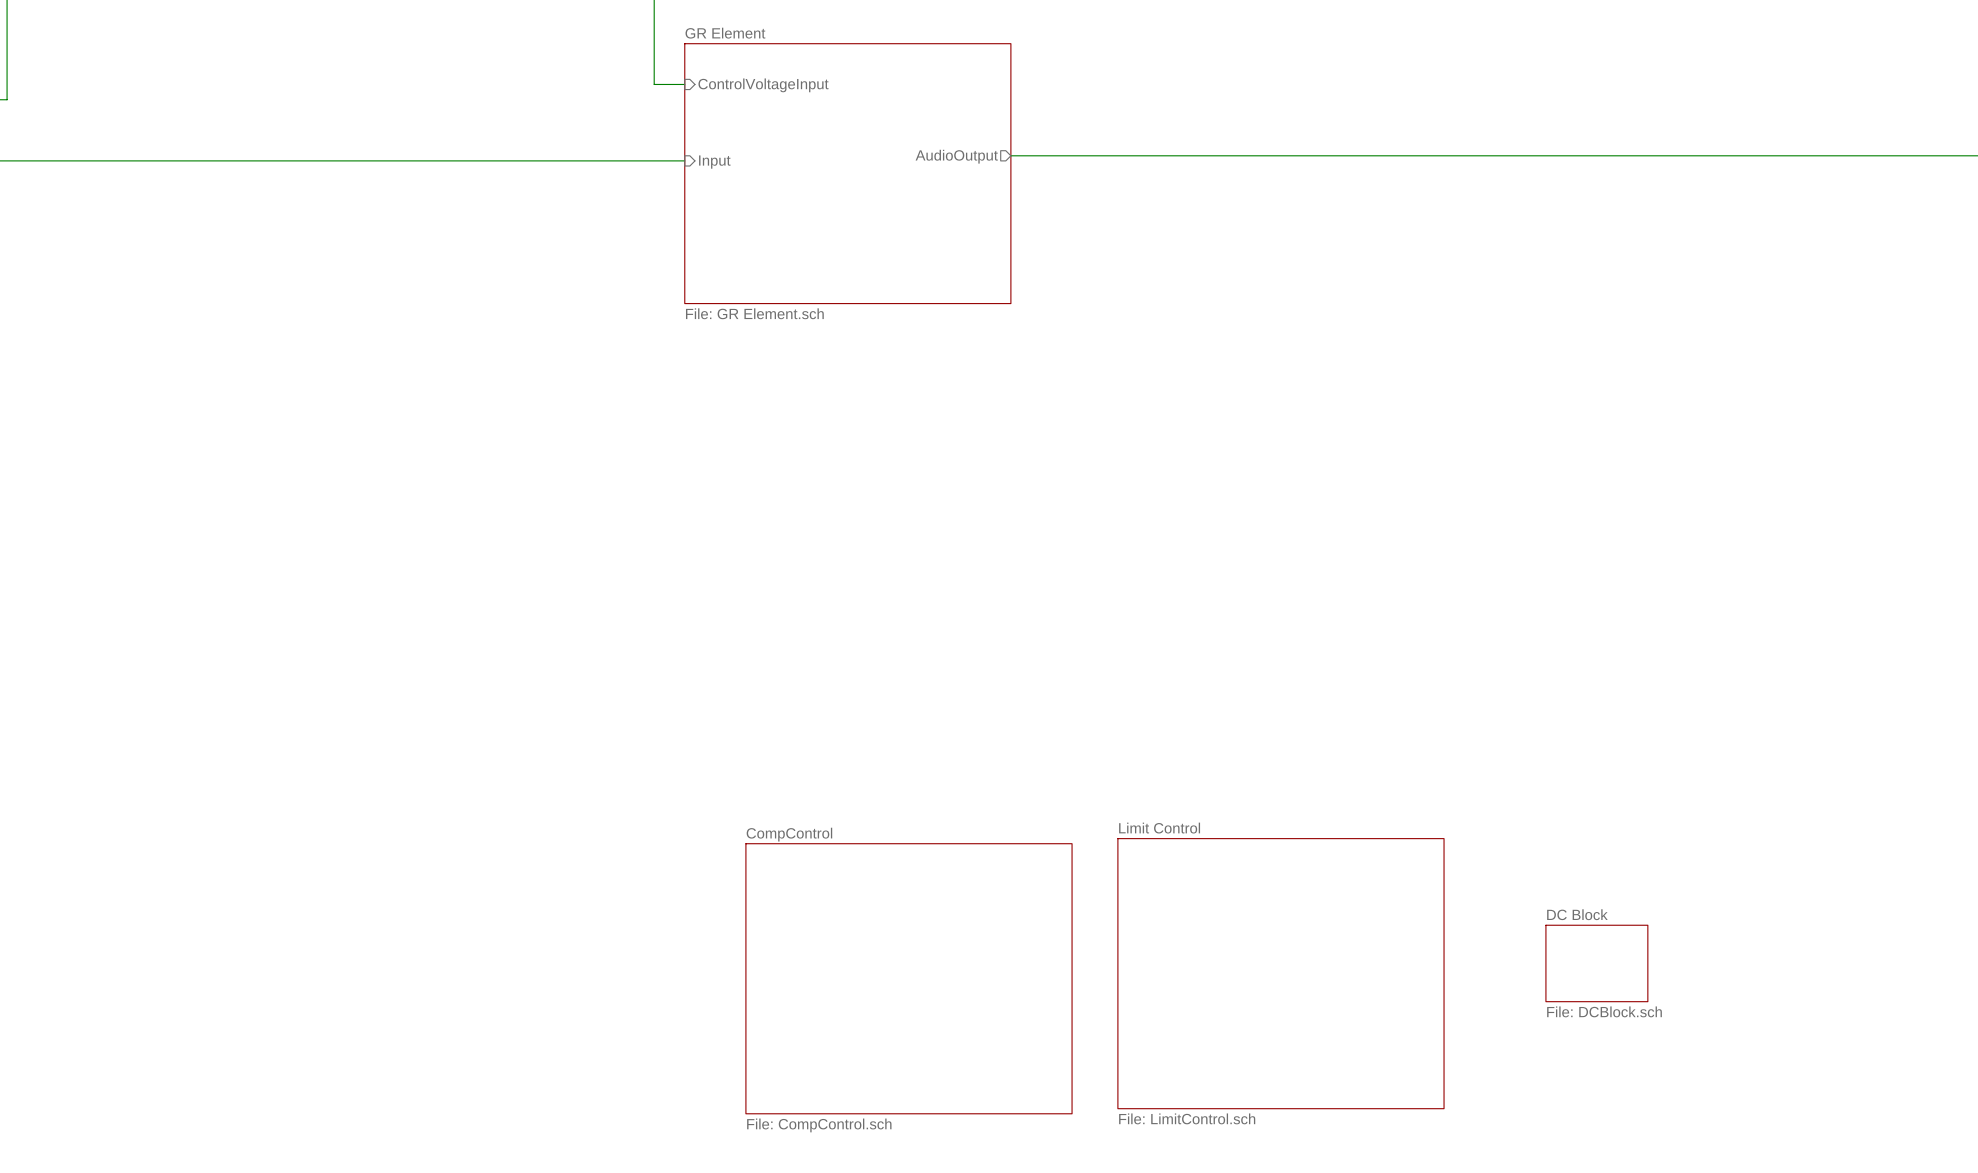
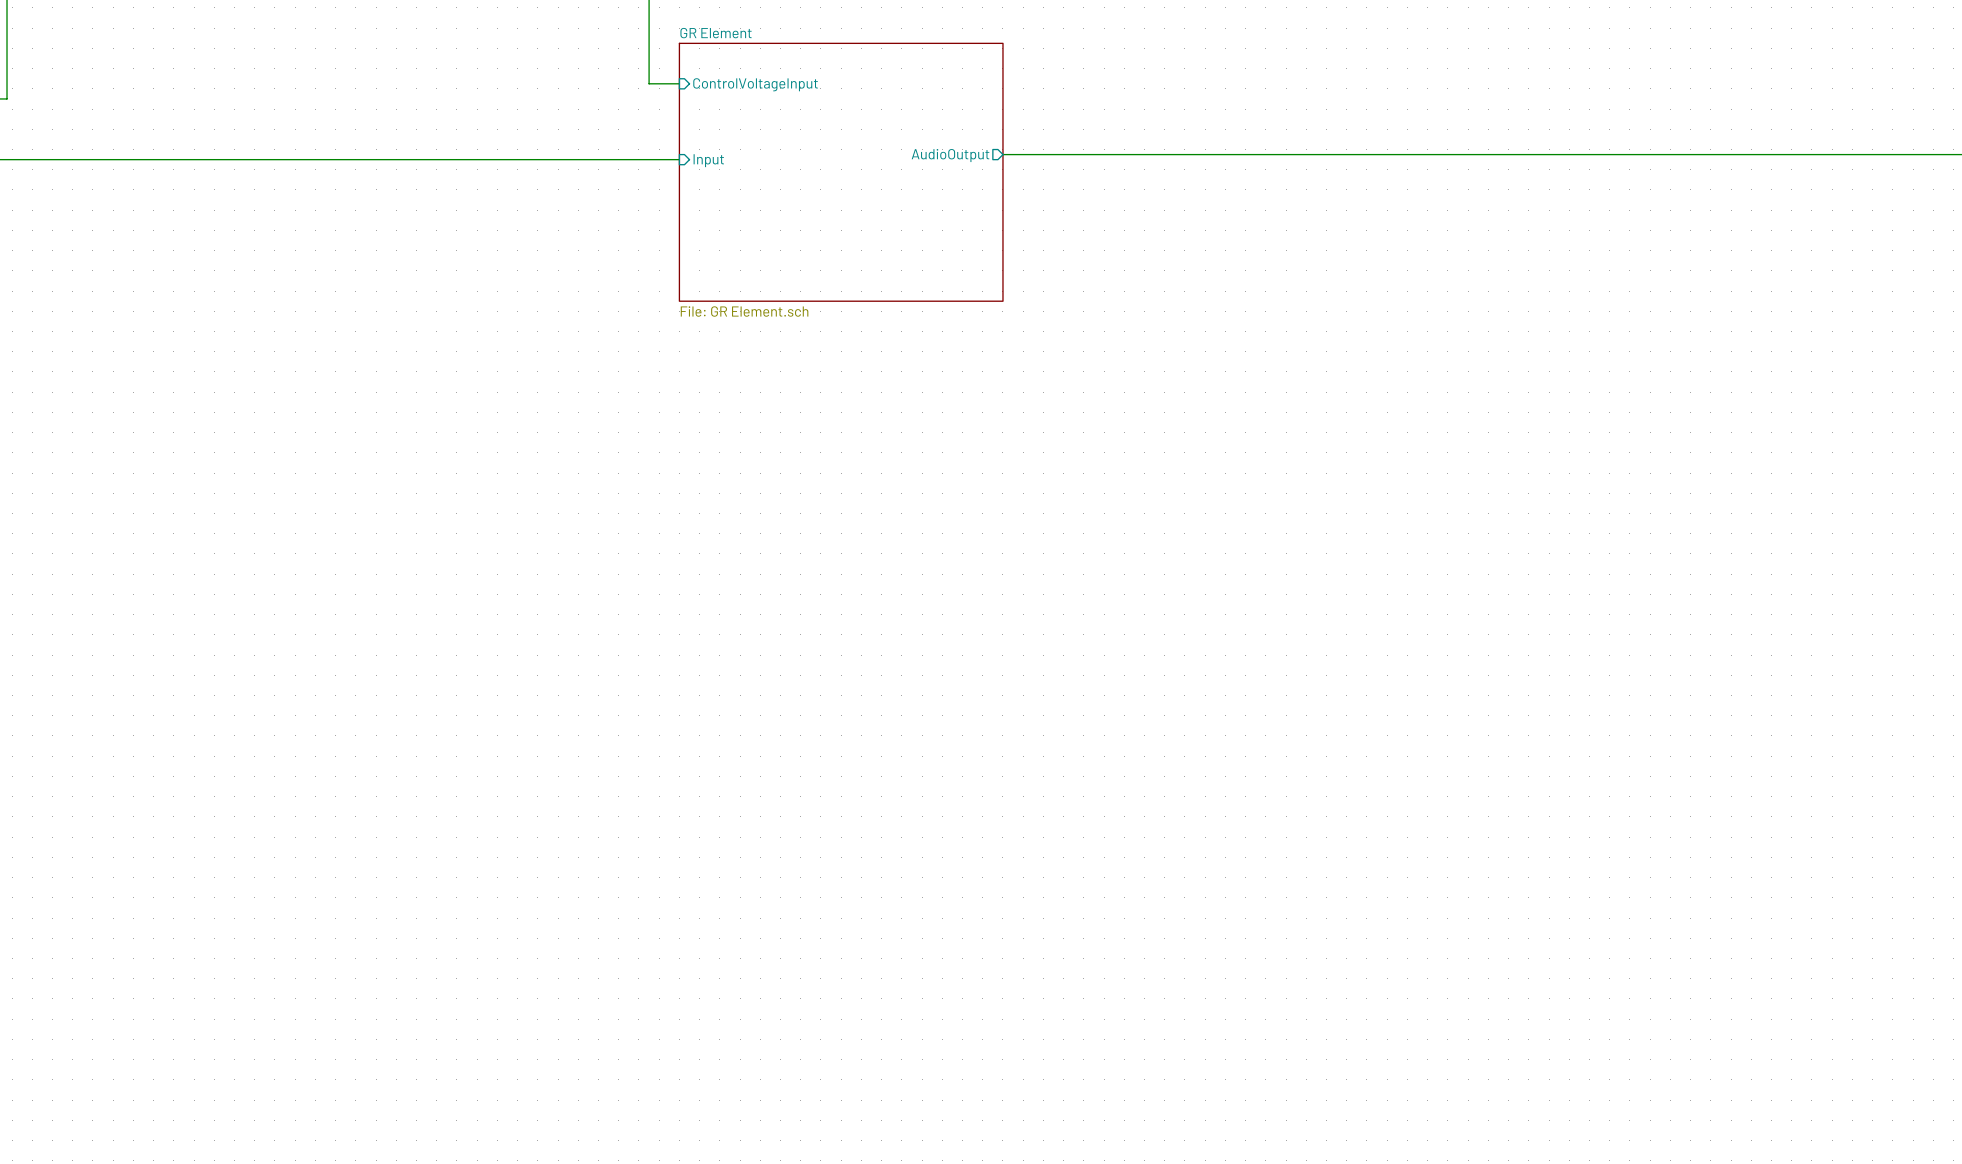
sheet DC Block: File: DCBlock.sch (1596, 963) -> none
sheet Limit Control: File: LimitControl.sch (1280, 973) -> none
sheet CompControl: File: CompControl.sch (908, 978) -> none

